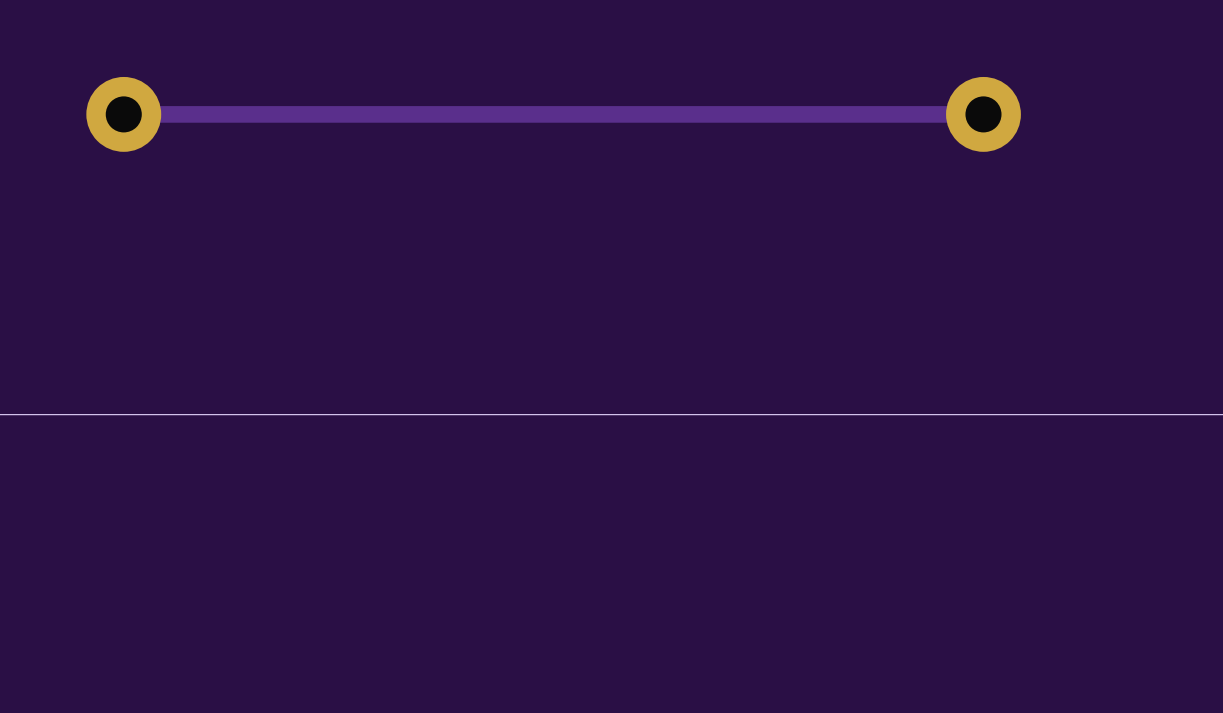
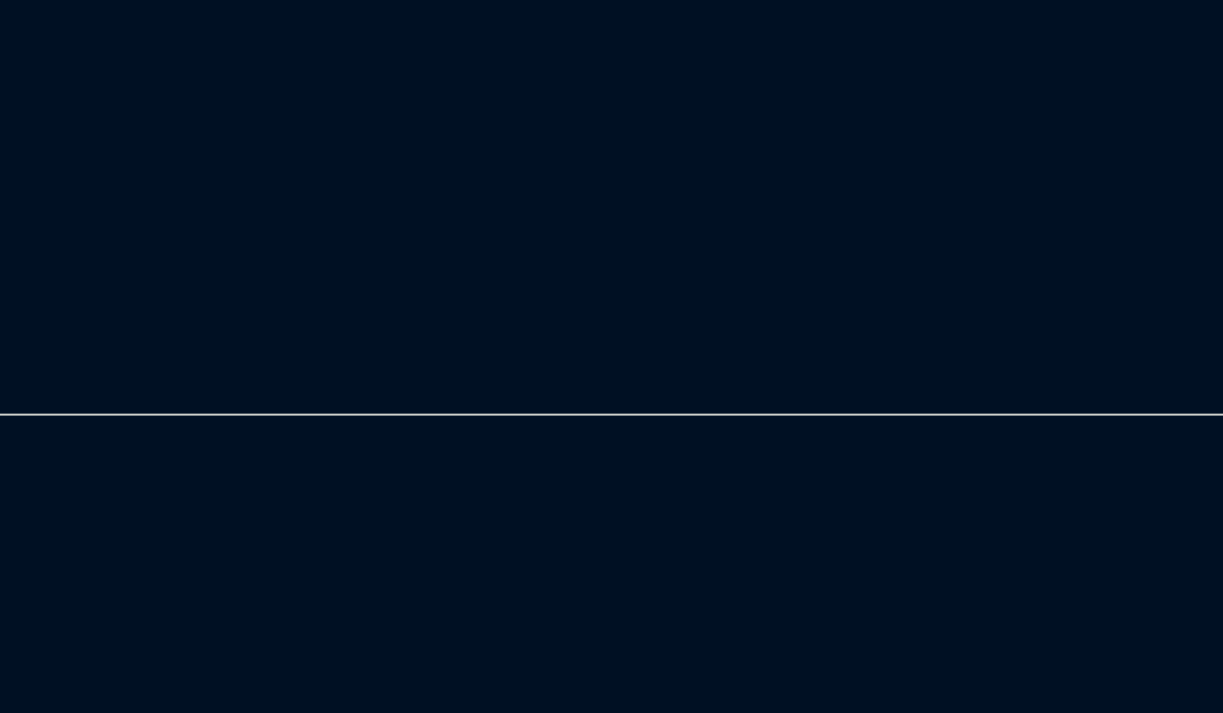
via: (123, 114) -> none
track: (983, 114) (123, 114) -> none
via: (983, 114) -> none

